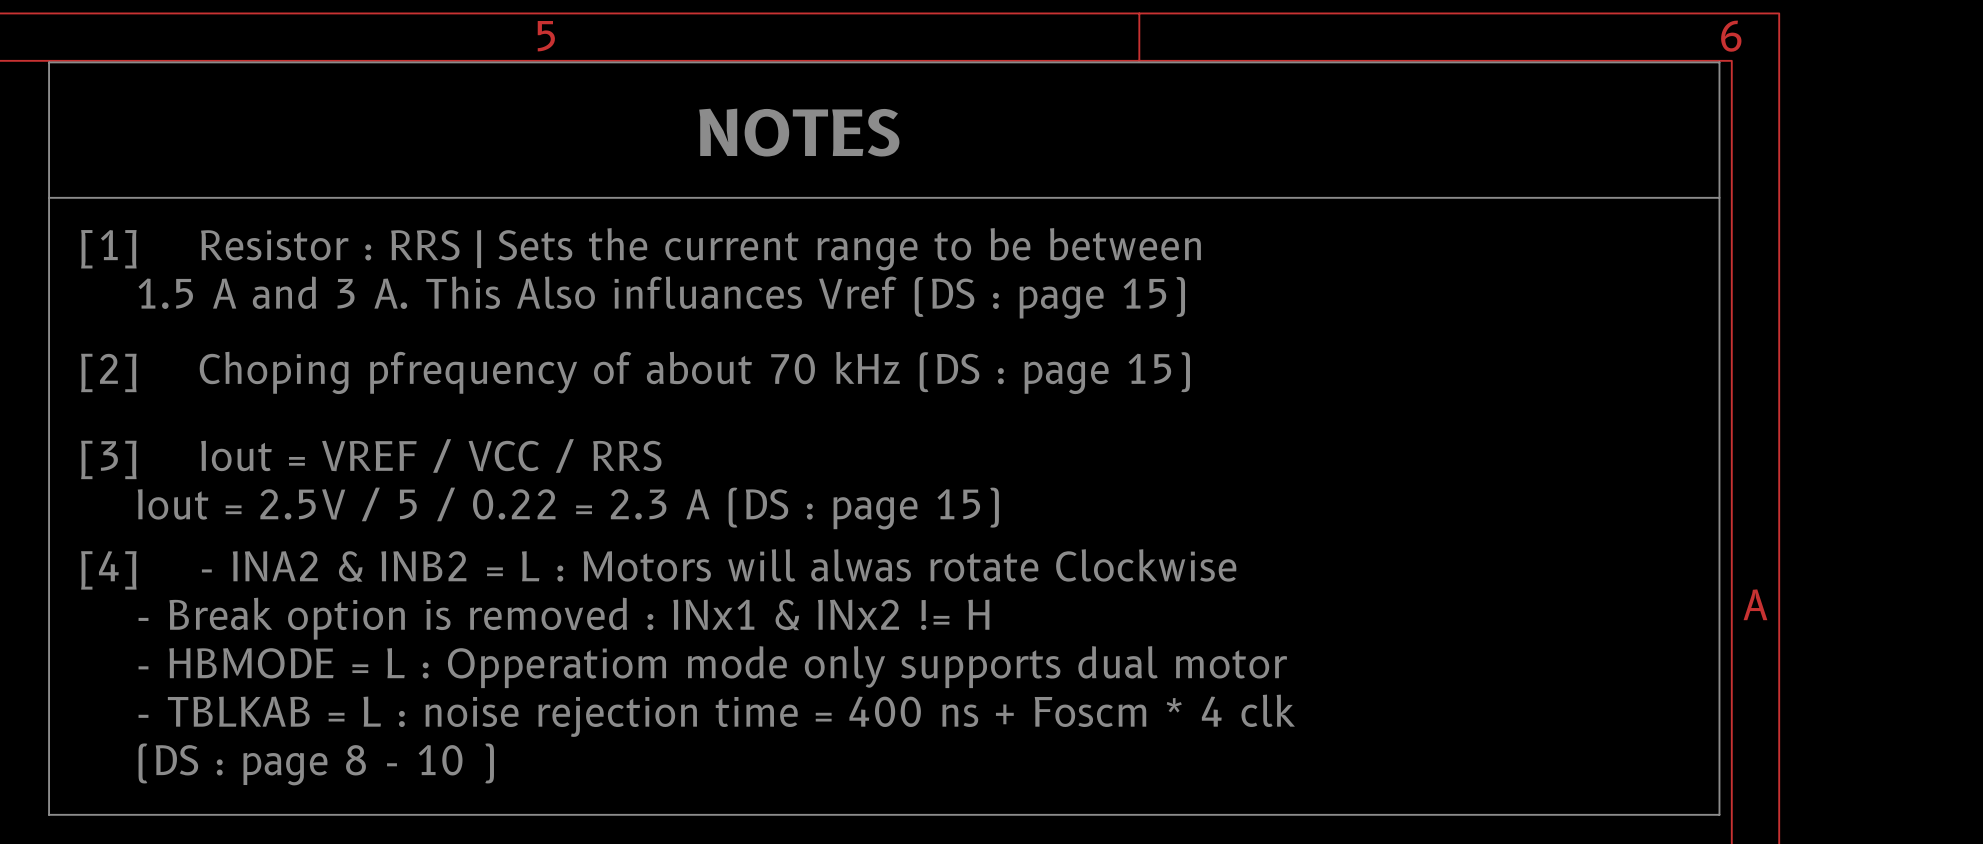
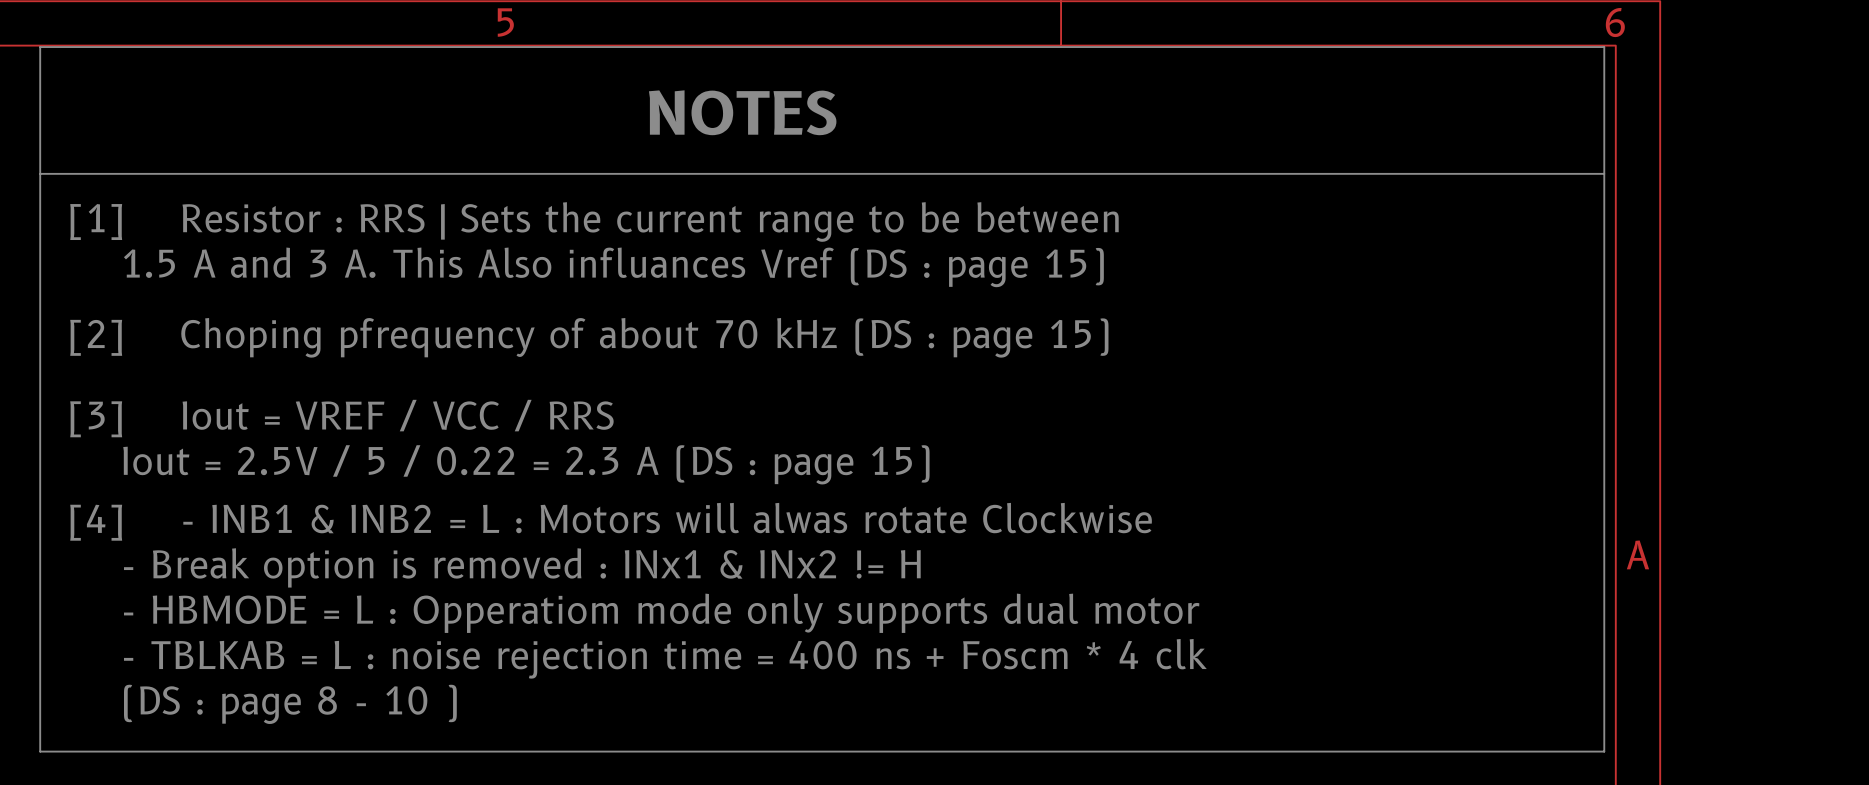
text: [4] - INA2 & INB2 = L : Motors will alwas rotate Clockwise (658, 569) -> [4] - INB1 & INB2 = L : Motors will alwas rotate Clockwise (611, 521)

